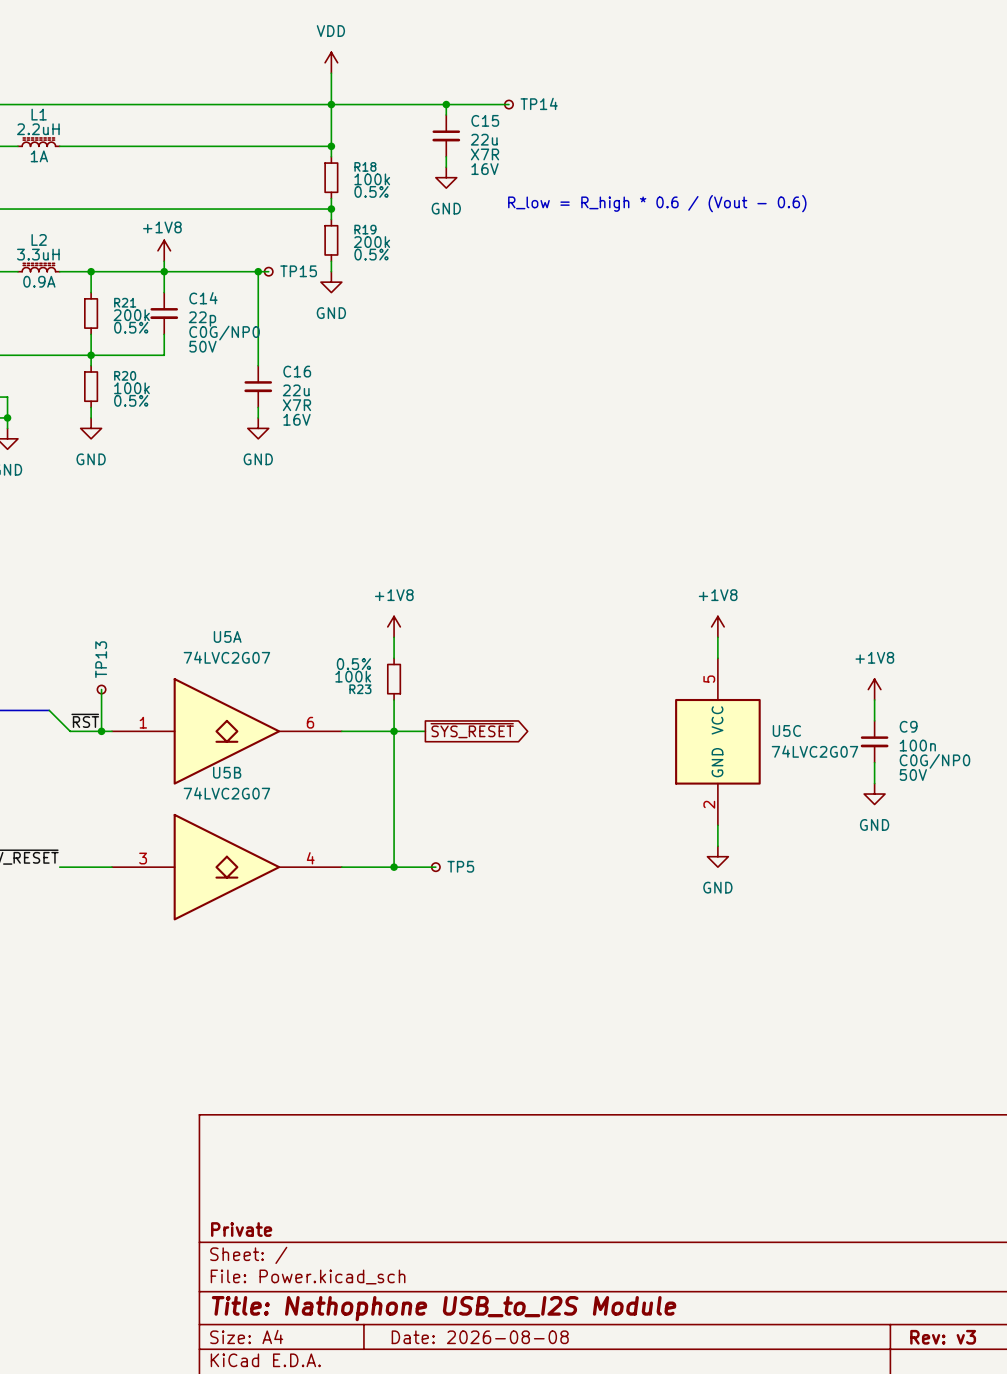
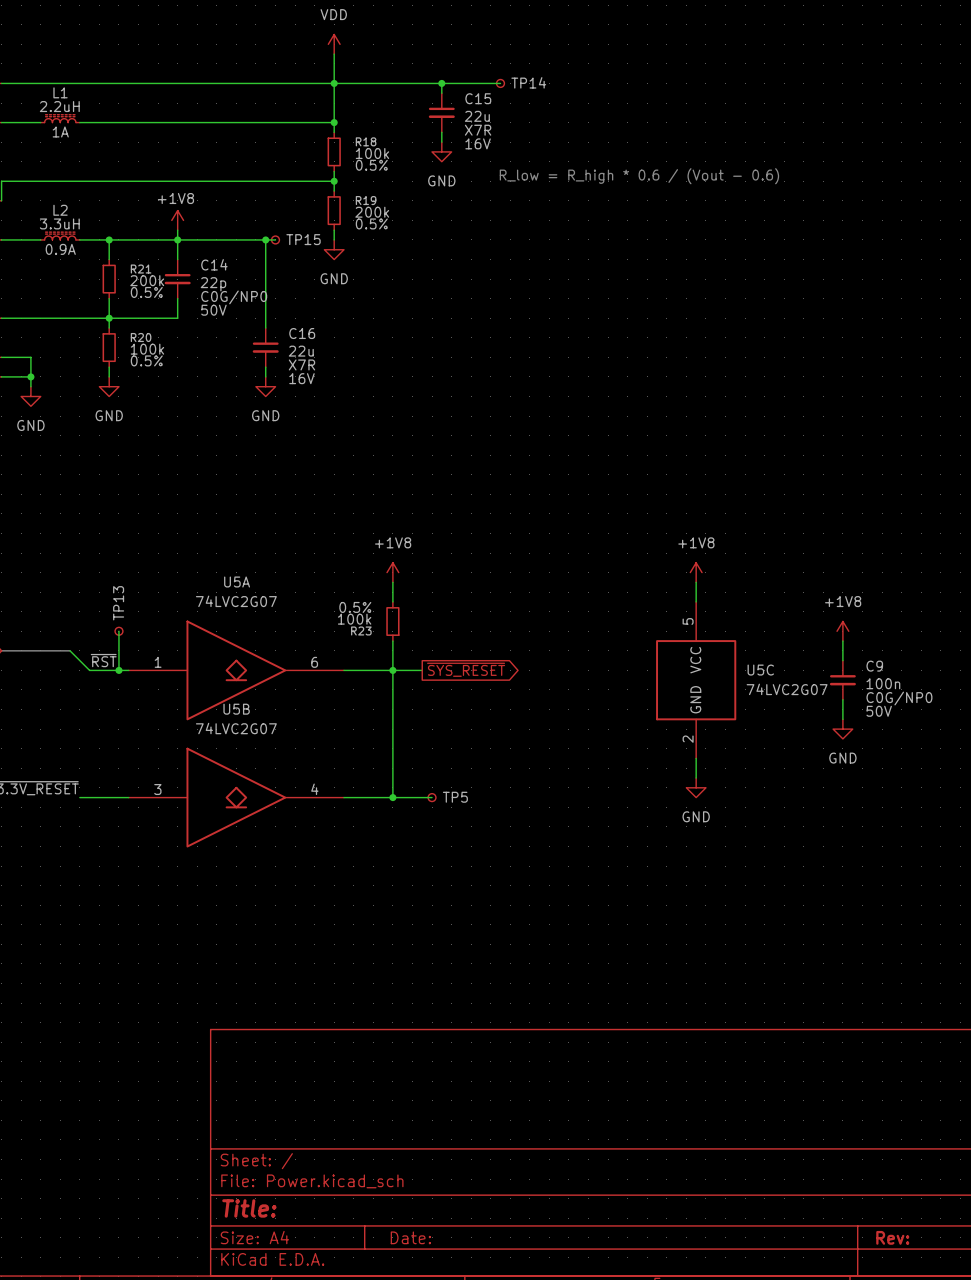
title block: Private (241, 1229) -> none
title block: Title: Nathophone USB_to_I2S Module (444, 1308) -> Title: (249, 1208)
title block: Date: 2026-08-08 (480, 1337) -> Date: (410, 1237)
title block: Rev: v3 (943, 1337) -> Rev: (892, 1237)

